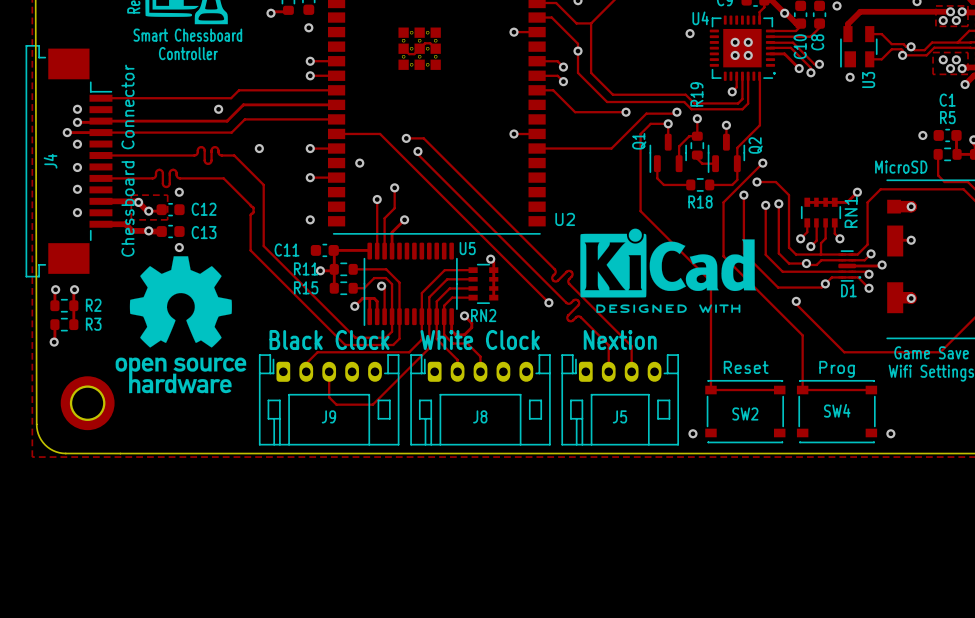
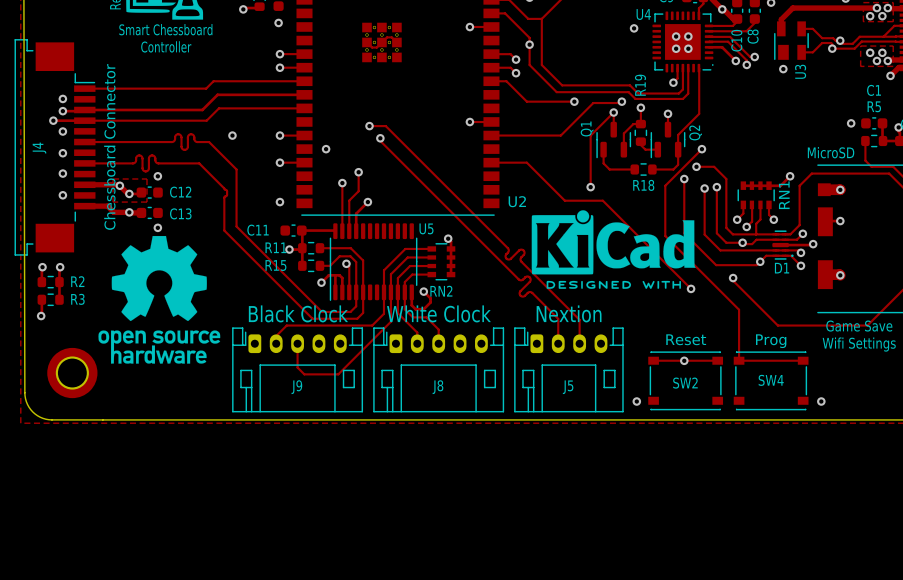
via: (218, 109) -> none
track: (668, 123) (650, 123) (640, 134) (640, 211) (710, 281) (710, 390) -> (613, 112) (590, 135) (590, 187)
track: (336, 133) (380, 133) (548, 302) -> none
track: none -> (491, 162) (526, 162) (564, 200) (602, 200) (691, 288)
via: none -> (590, 187)
via: (548, 302) -> none
via: none -> (691, 288)
via: none -> (684, 360)

